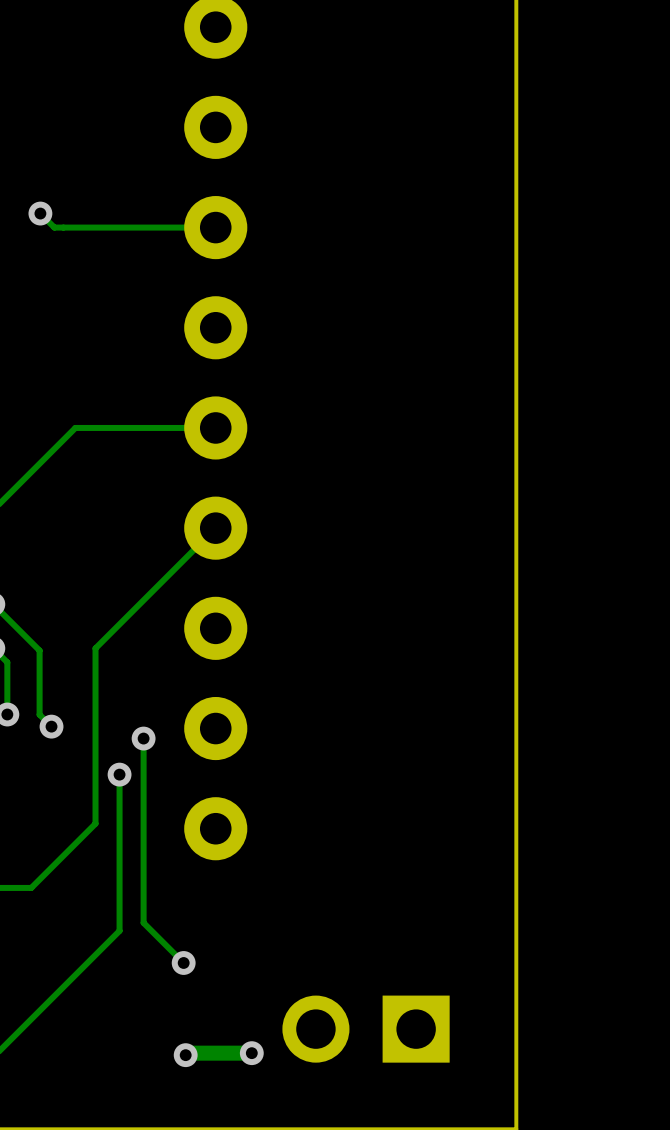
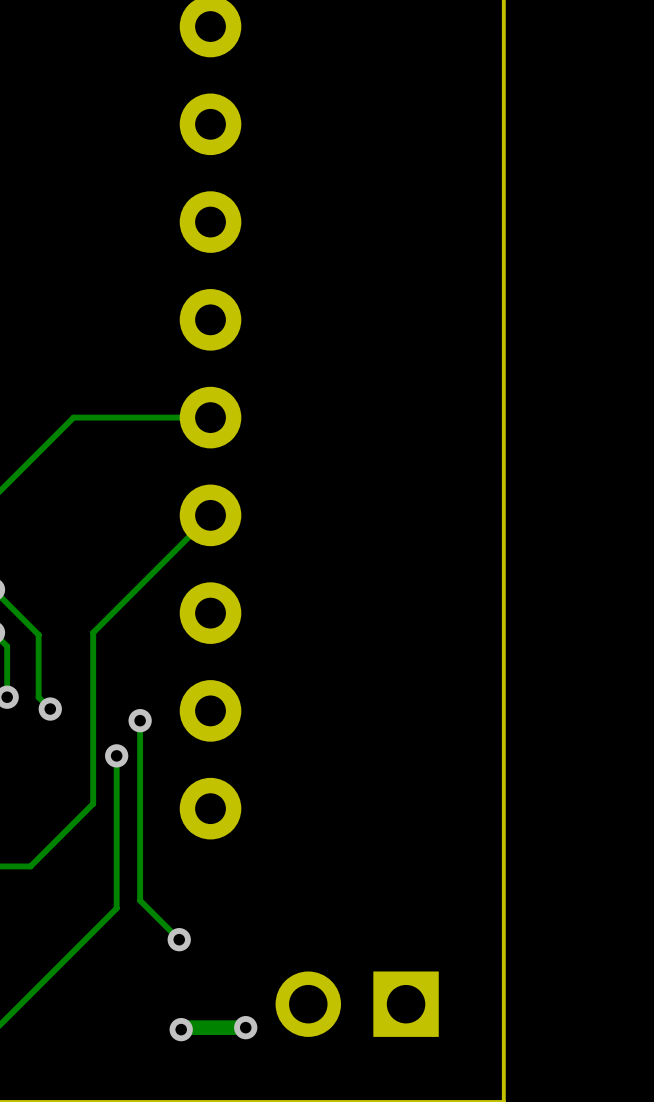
track: (40, 213) (54, 227) (215, 227) -> none
via: (40, 213) -> none

